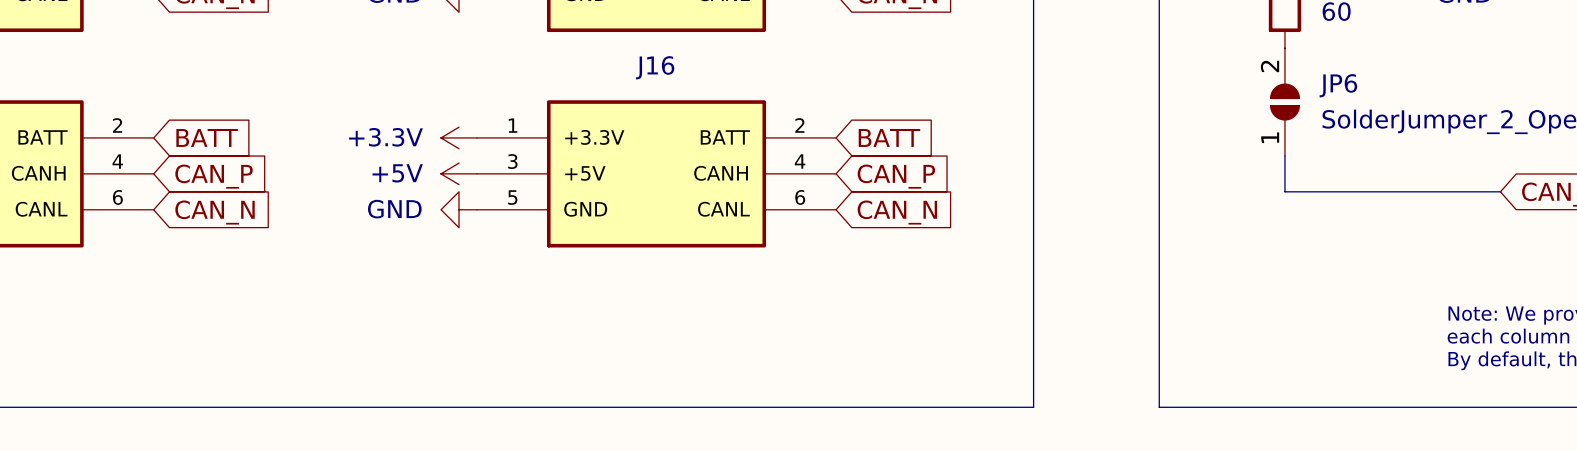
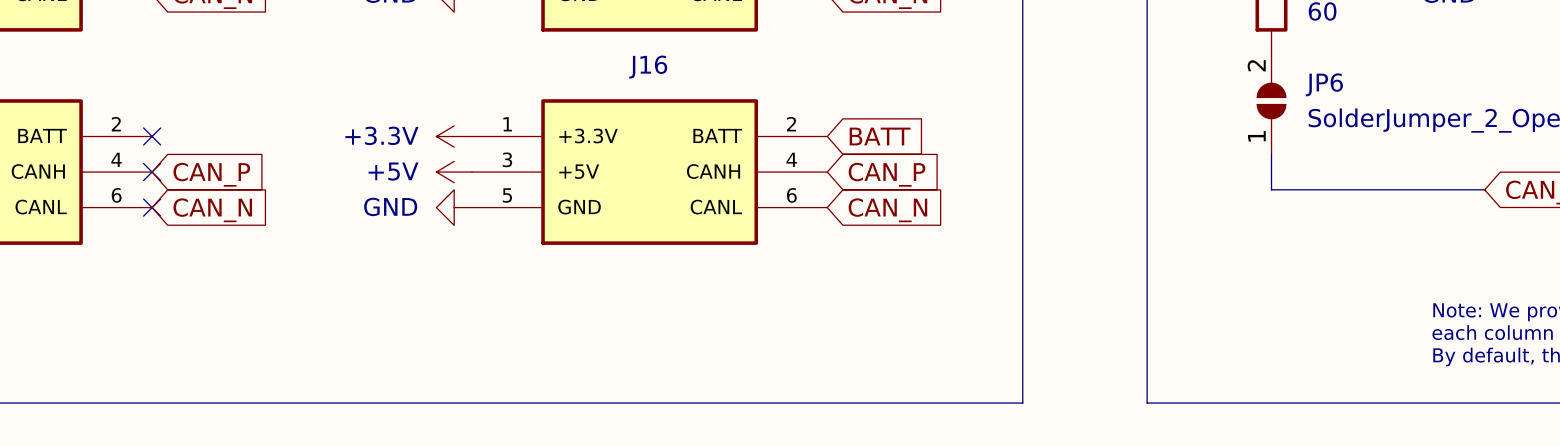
no-connect mark: none -> (152, 136)
global label: BATT (207, 137) -> none
no-connect mark: none -> (152, 172)
no-connect mark: none -> (152, 207)

